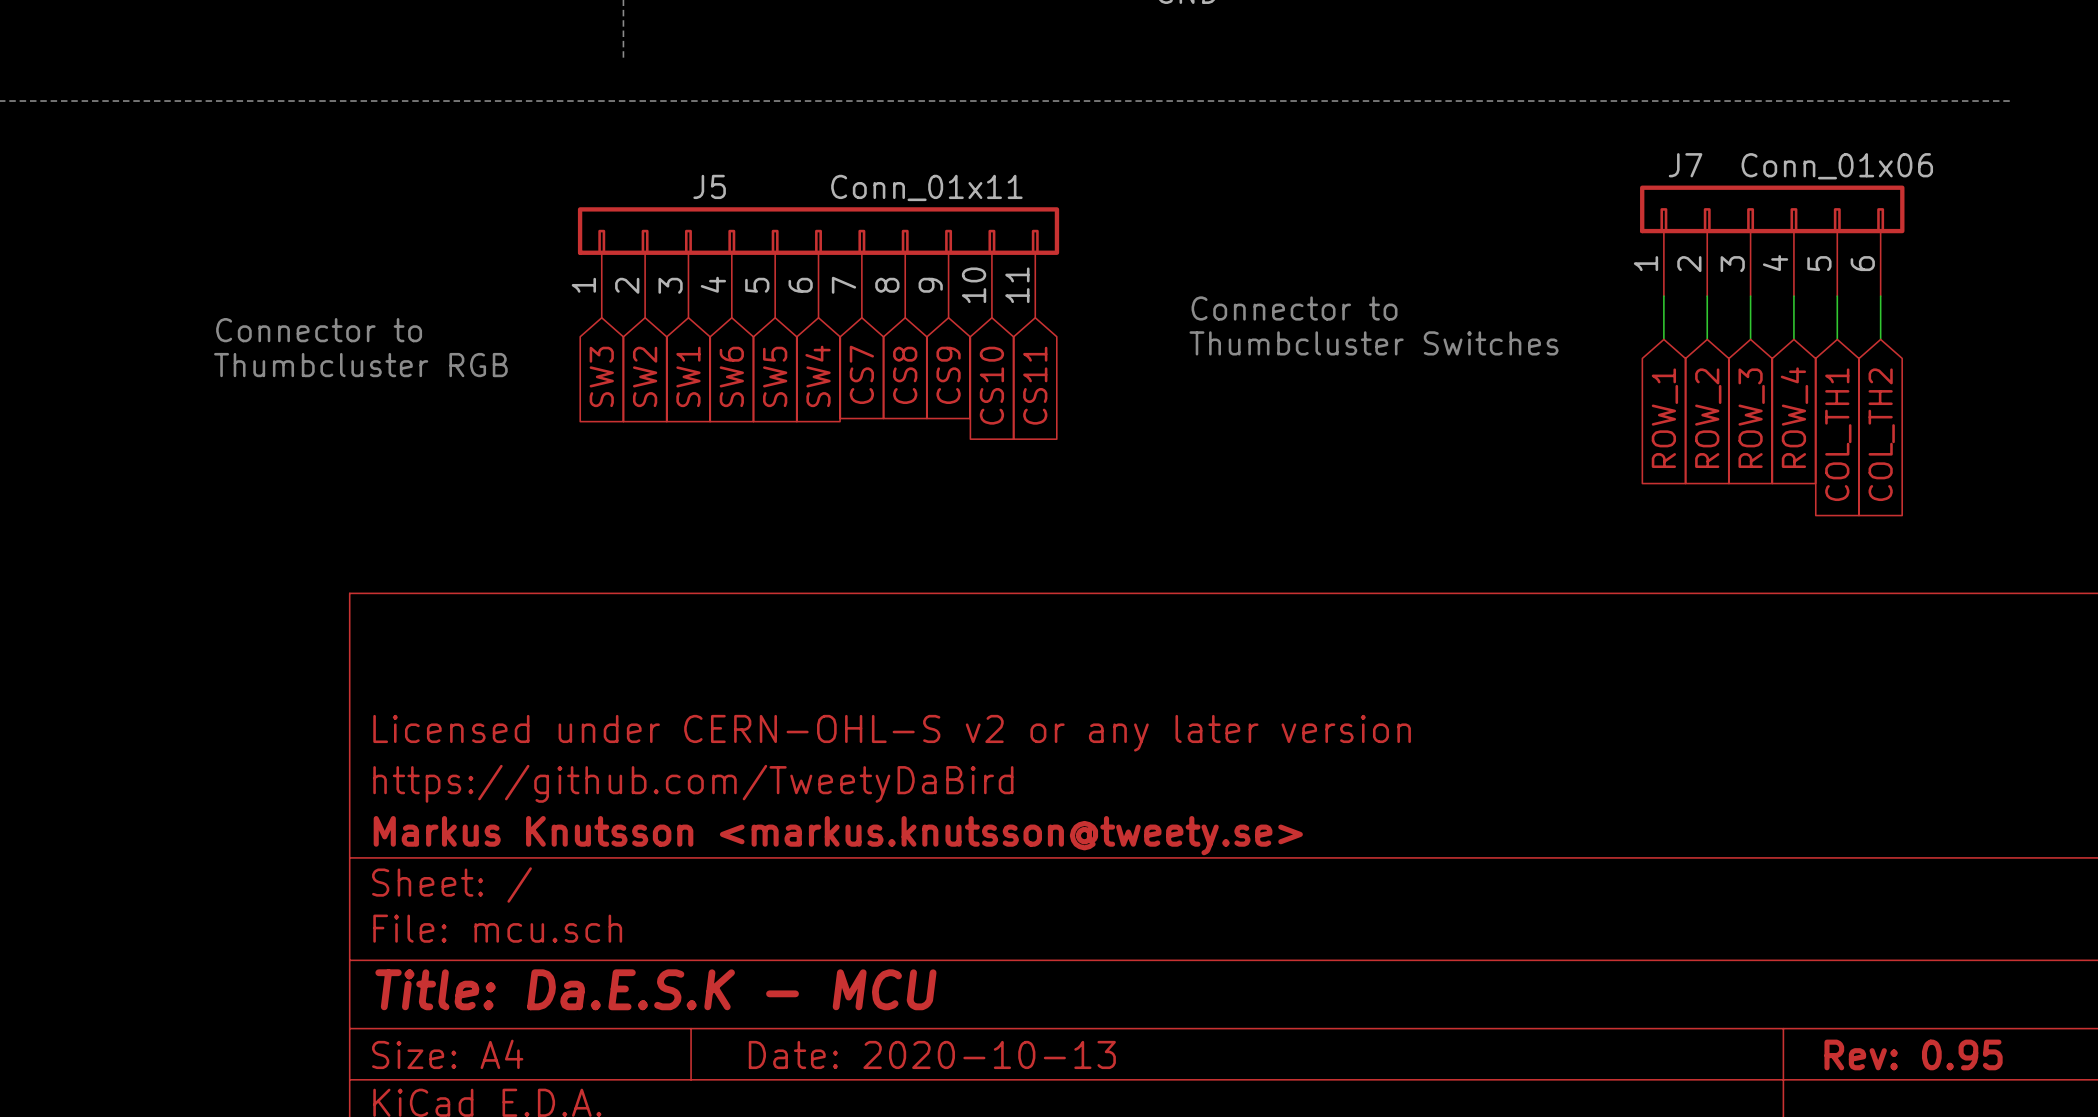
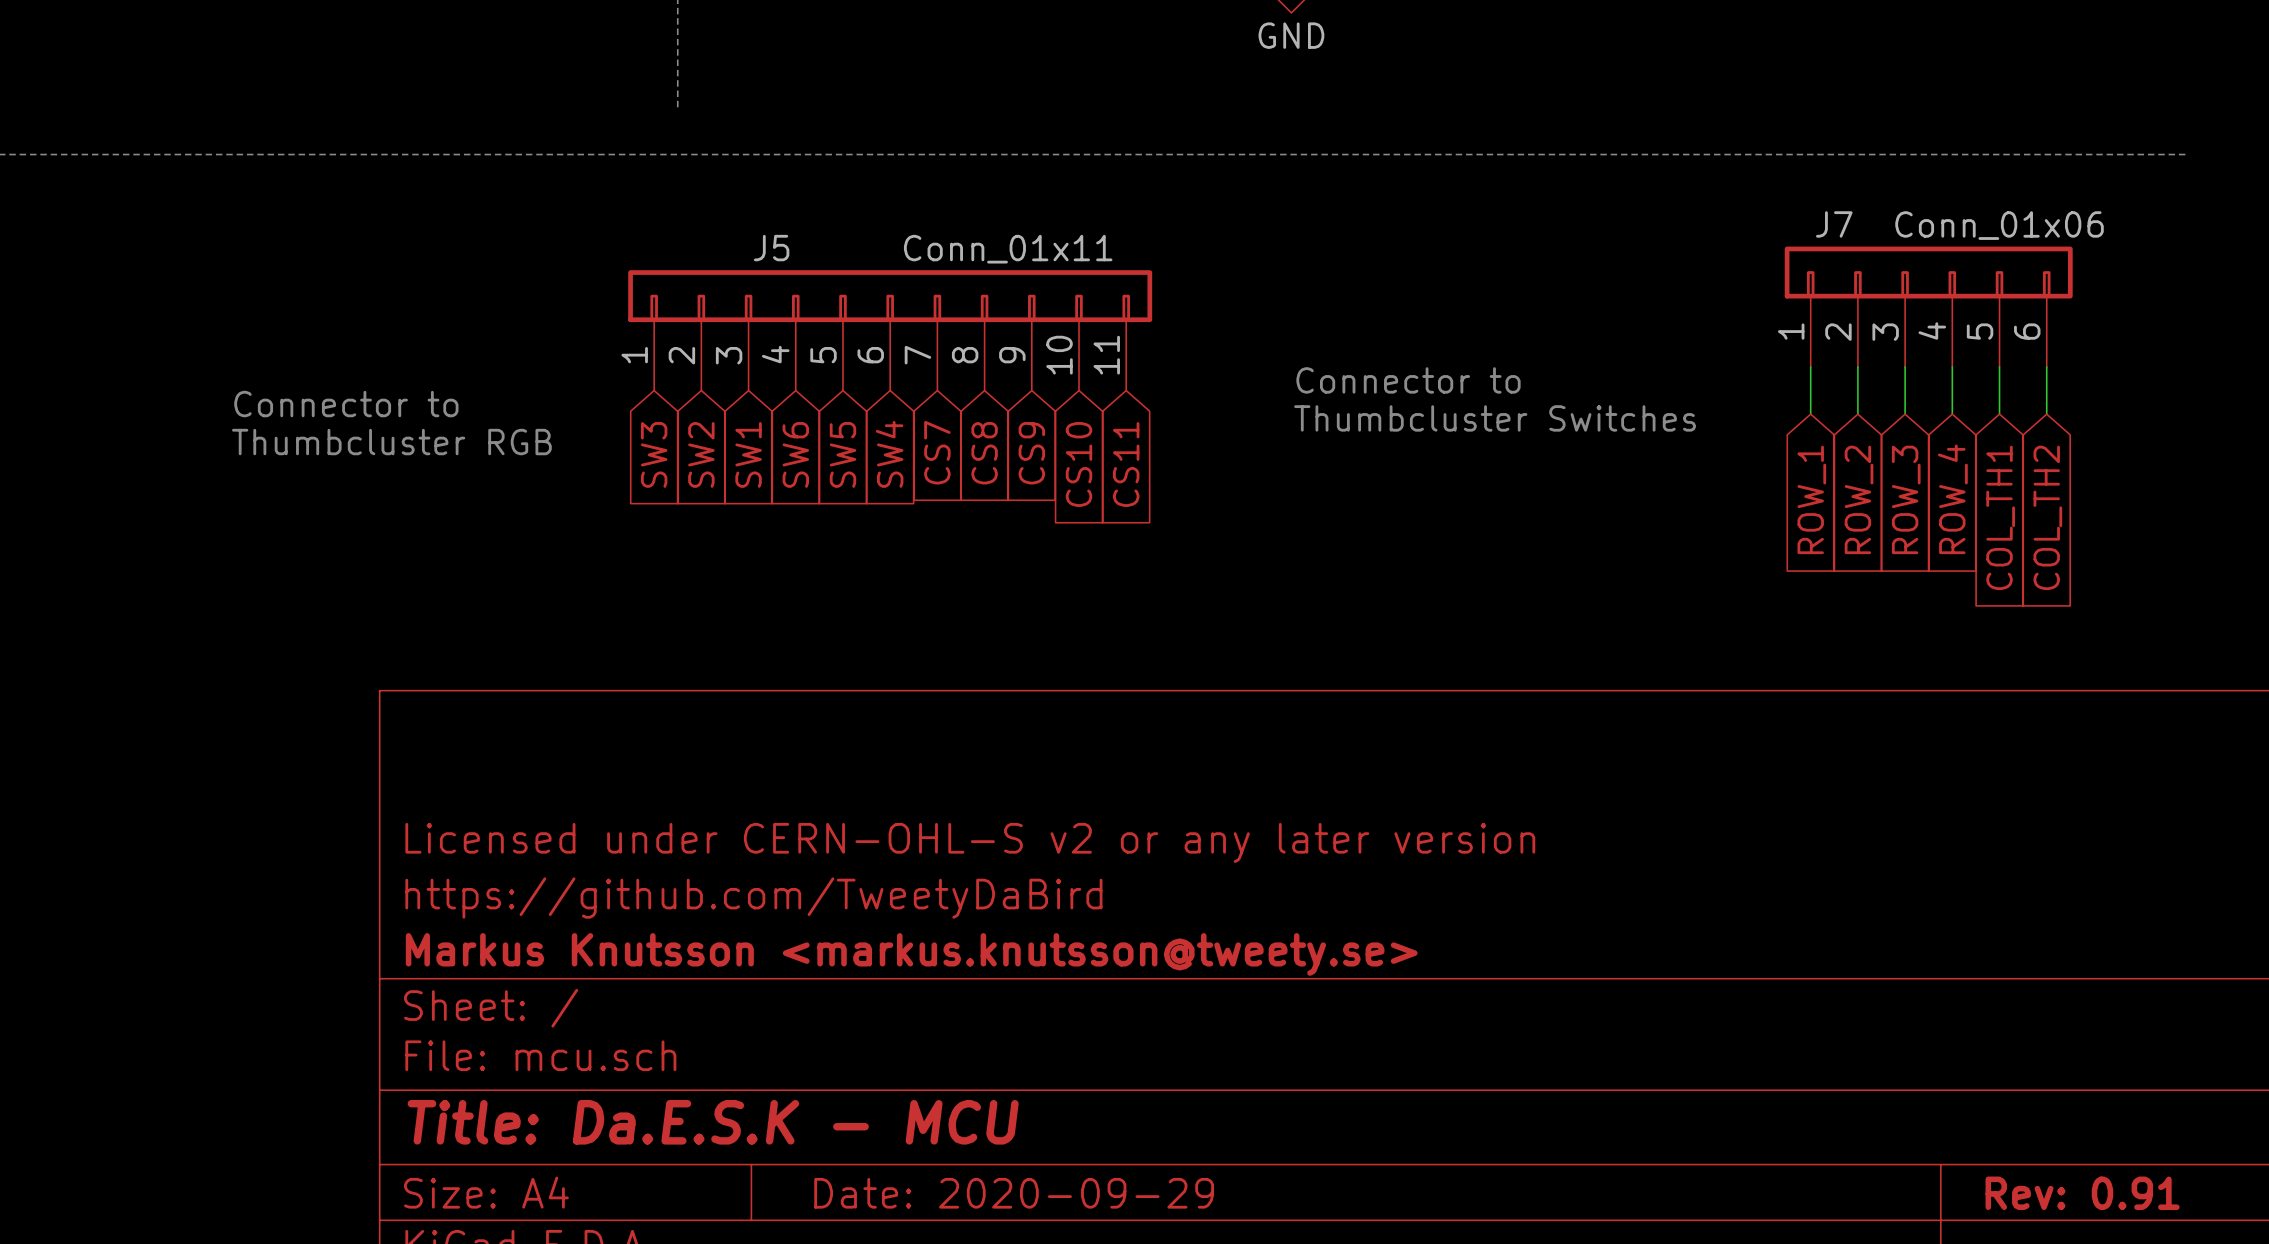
title block: Date: 2020-10-13 (932, 1054) -> Date: 2020-09-29 (1014, 1193)
title block: Rev: 0.95 (1913, 1054) -> Rev: 0.91 (2082, 1193)

